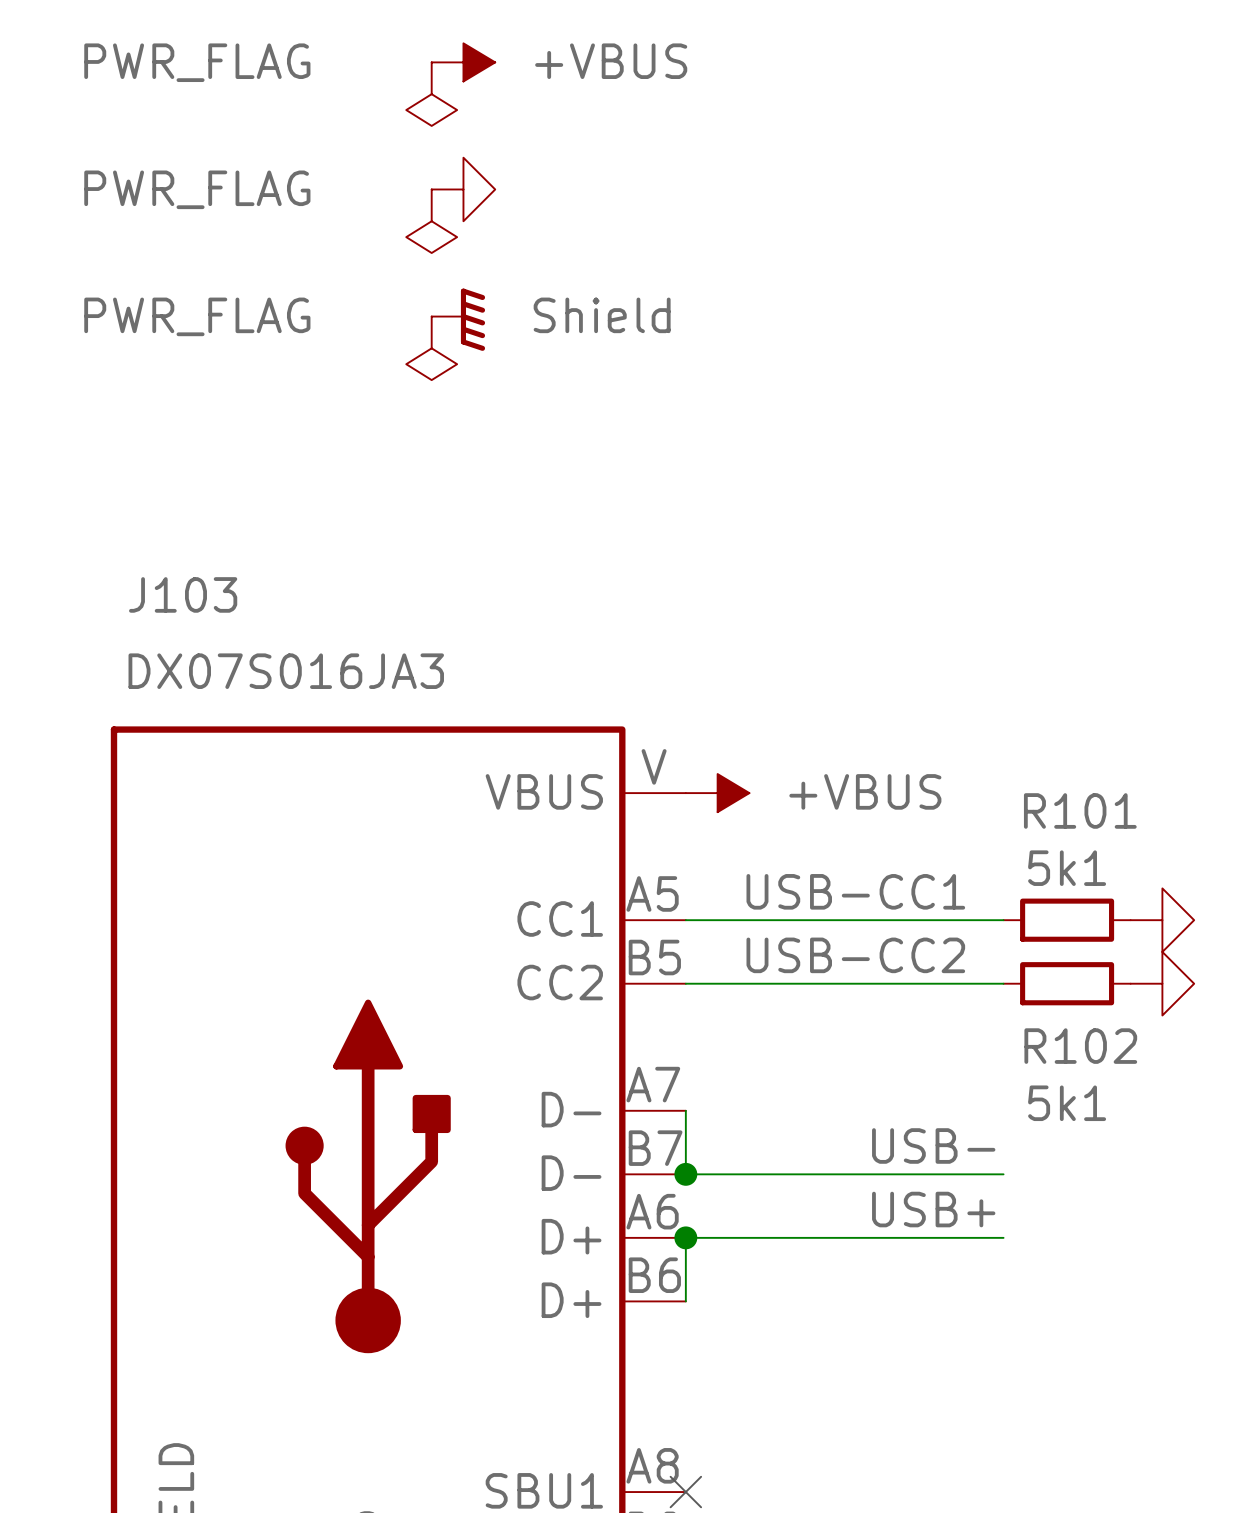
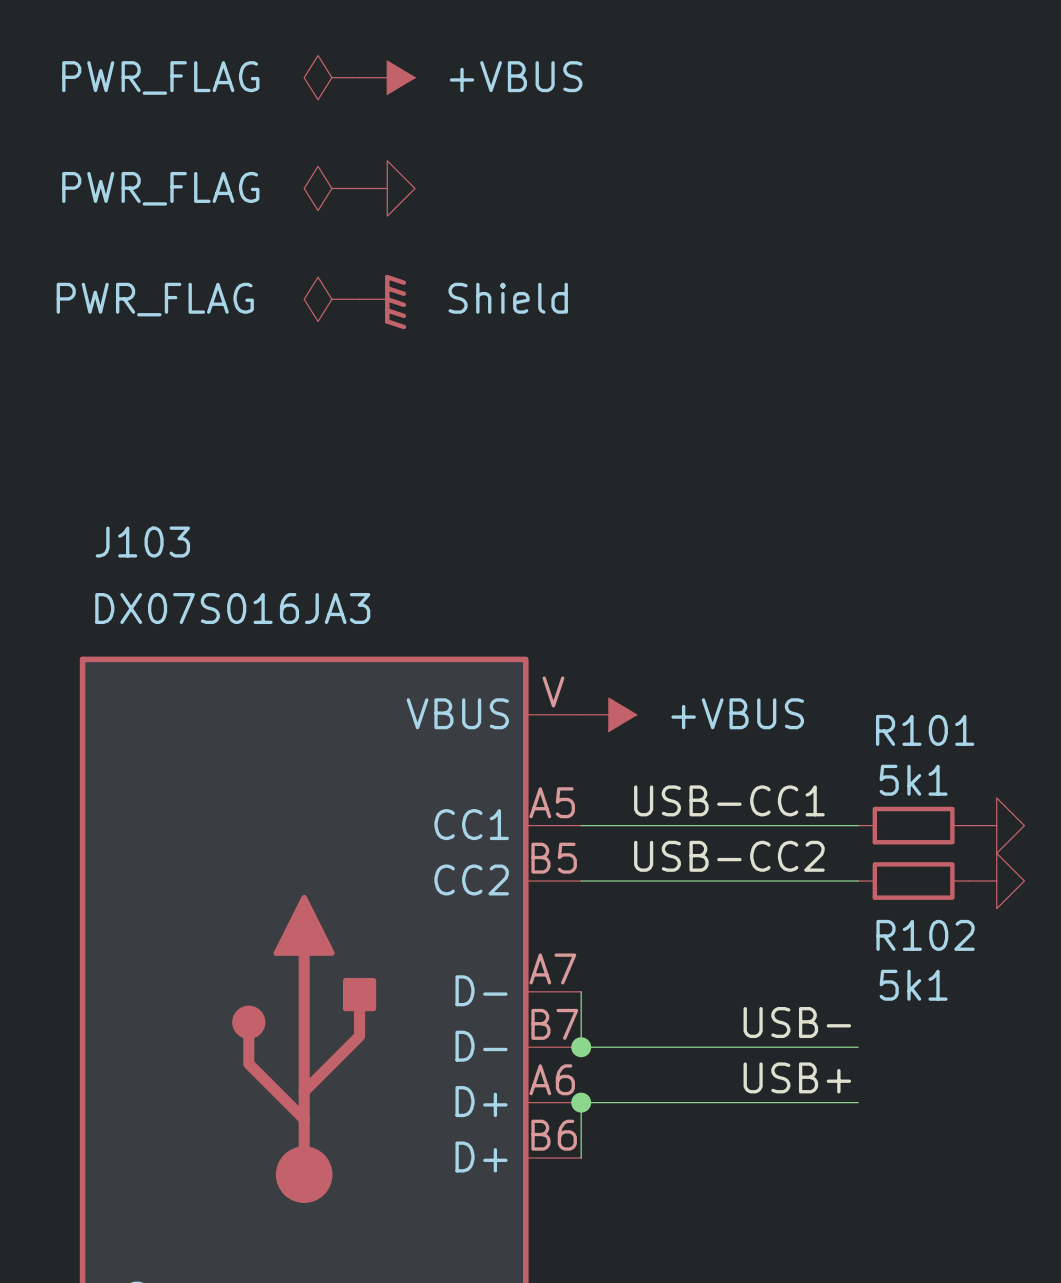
power symbol rotation: 0° (431, 94) -> 90° clockwise (331, 77)
power symbol position: PWR_FLAG (431, 94) -> PWR_FLAG (331, 77)
power symbol rotation: 0° (431, 221) -> 90° clockwise (331, 188)
power symbol position: PWR_FLAG (431, 221) -> PWR_FLAG (331, 188)
power symbol rotation: 0° (431, 348) -> 90° clockwise (331, 299)
power symbol position: PWR_FLAG (431, 348) -> PWR_FLAG (331, 299)

